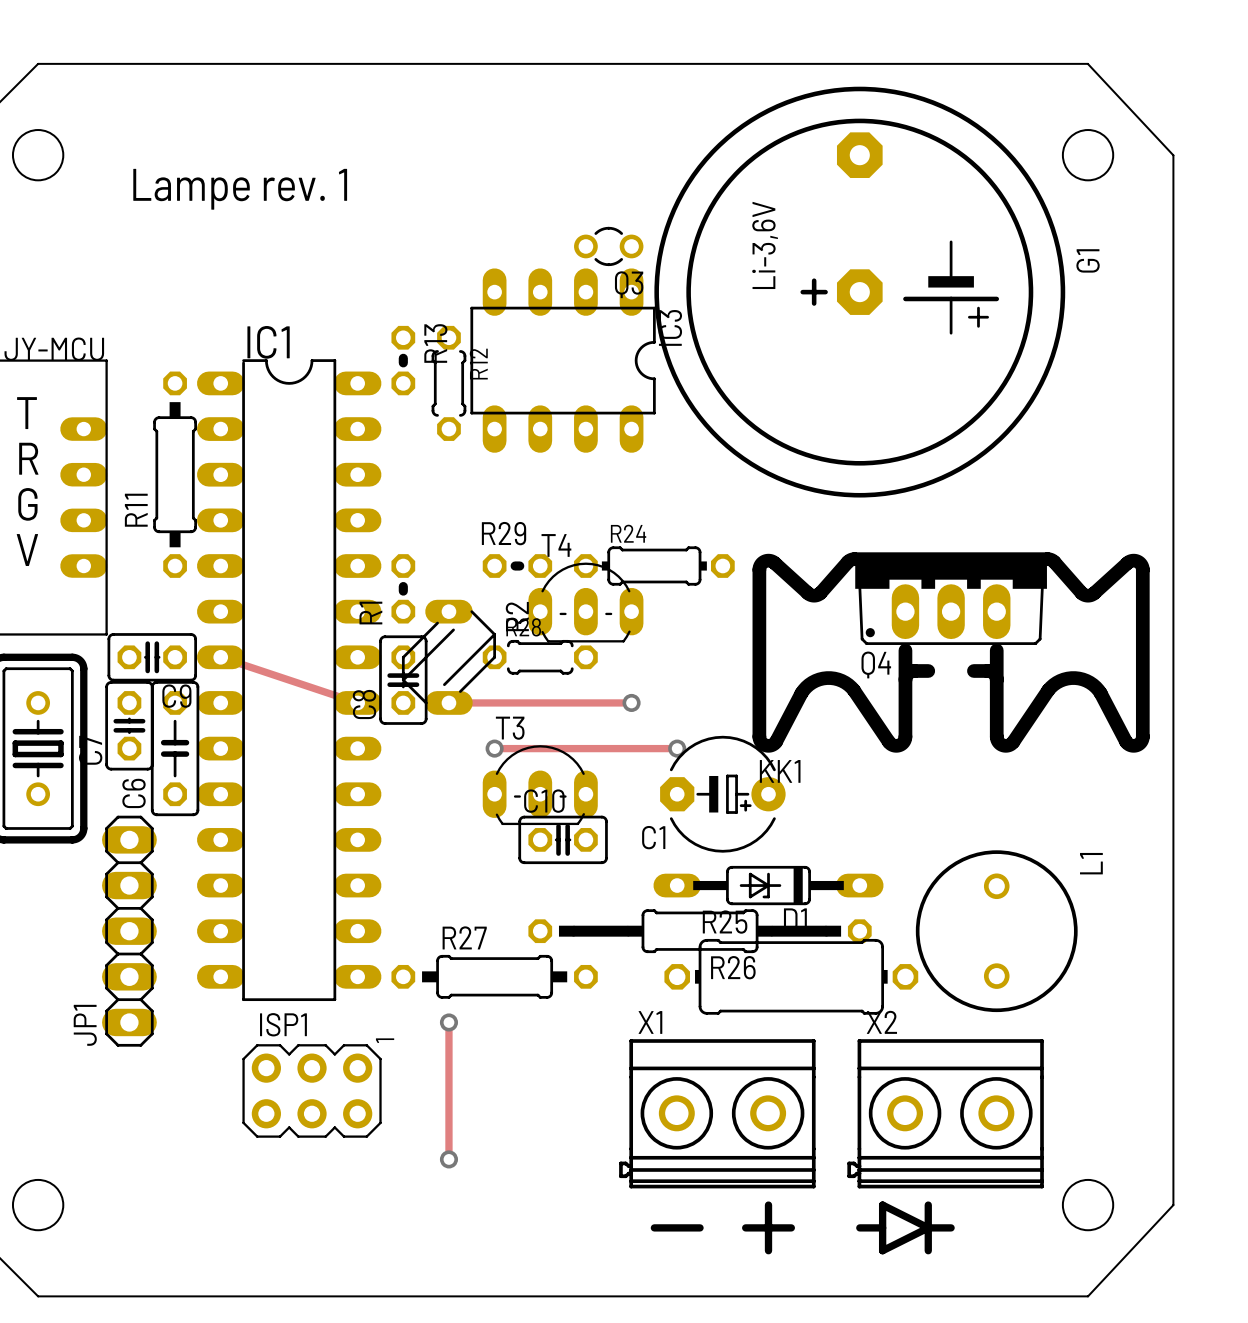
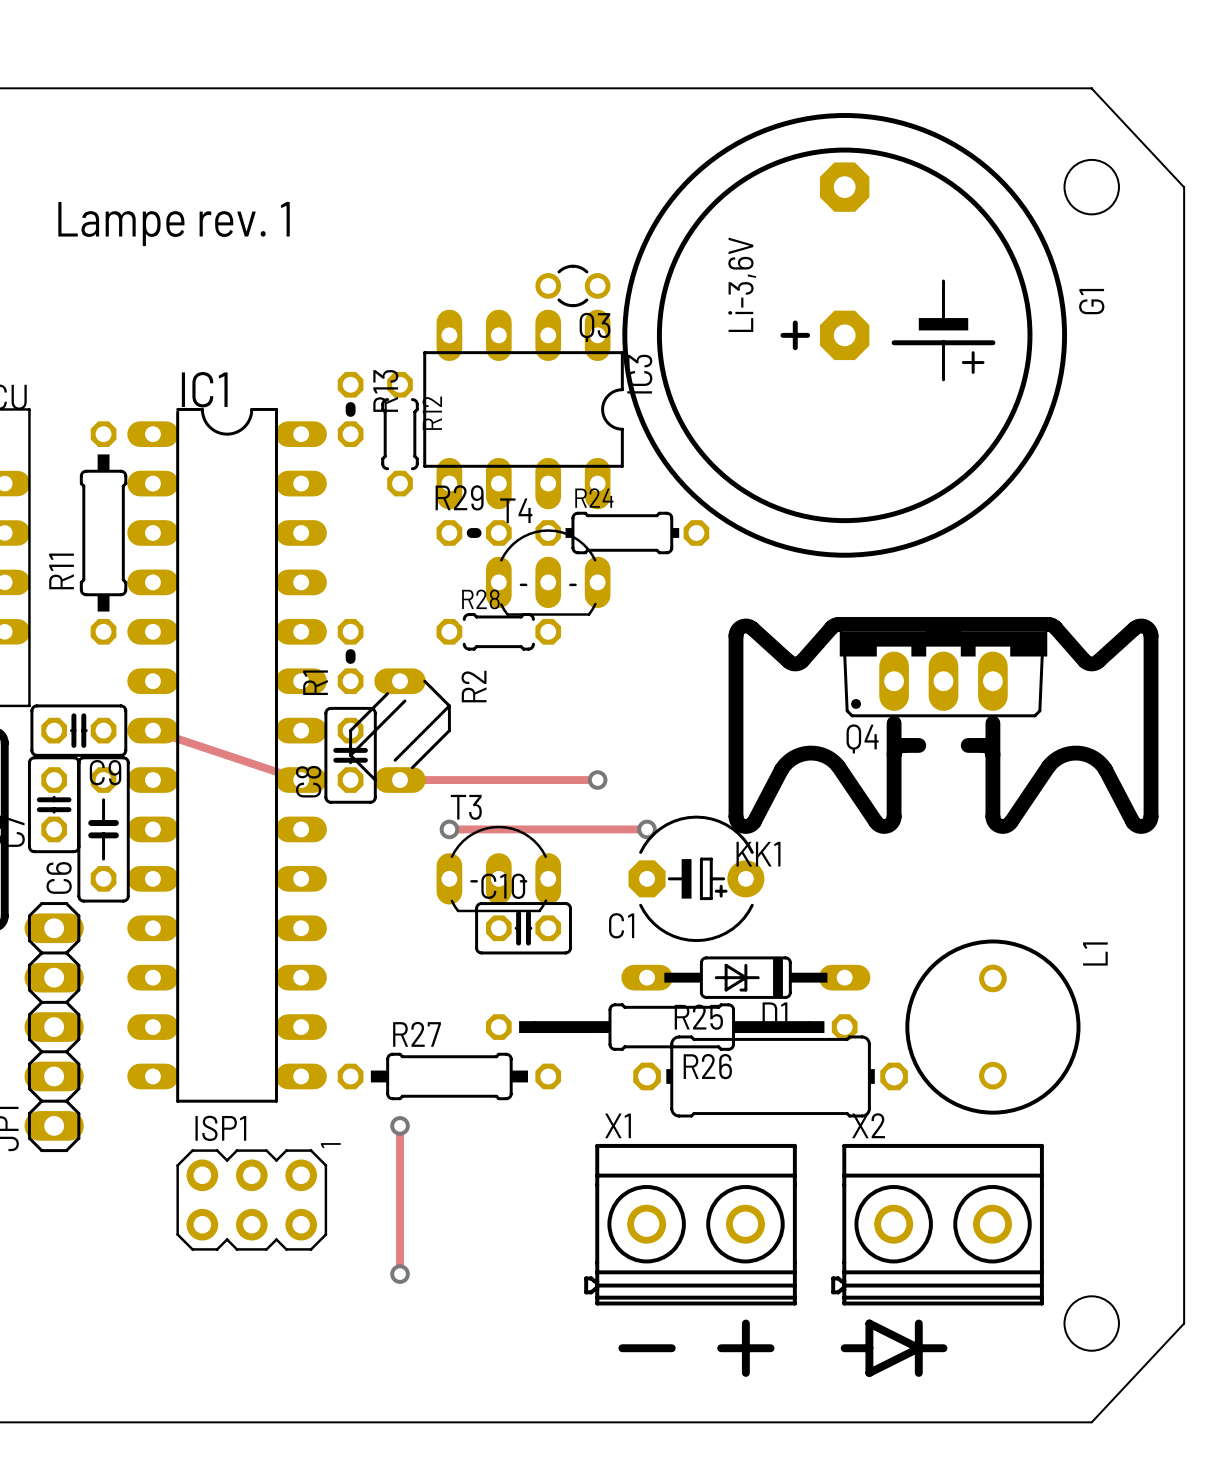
R29 position: (517, 566) -> (474, 532)
R24 position: (654, 566) -> (622, 532)
T4 position: (585, 602) -> (548, 572)
R28 position: (540, 657) -> (498, 631)

